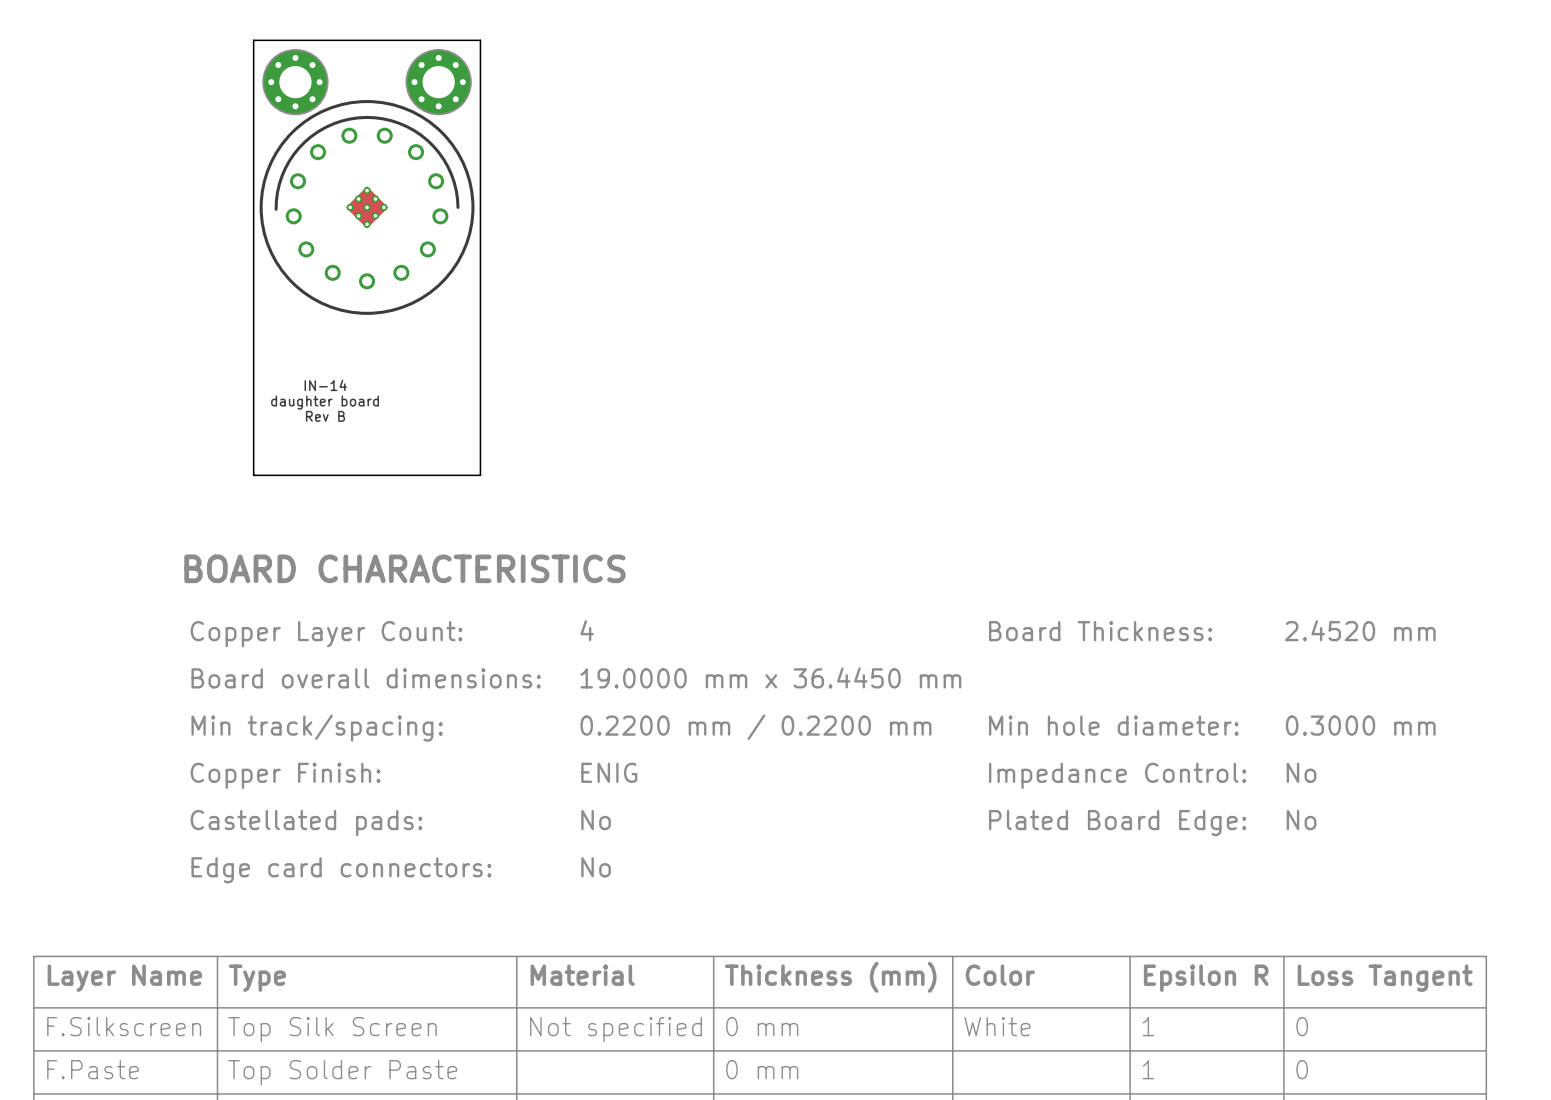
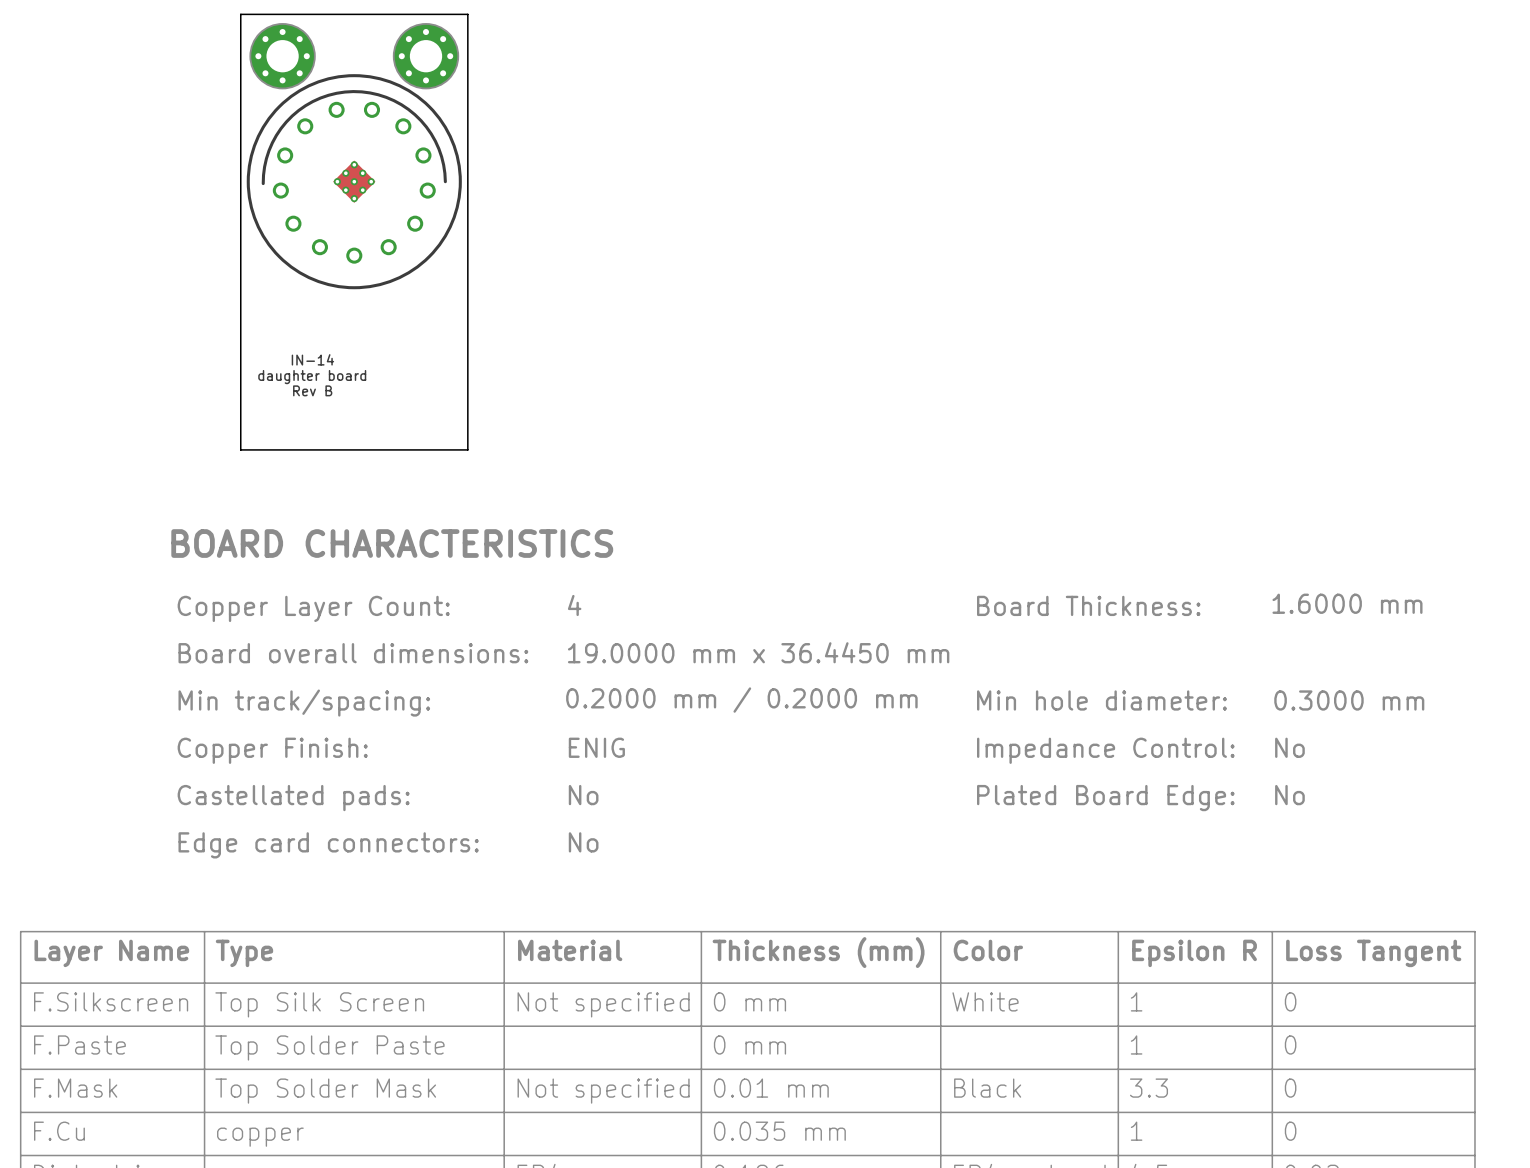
text: 2.4520 mm (1360, 630) -> 1.6000 mm (1347, 603)
text: 0.2200 mm / 0.2200 mm (755, 727) -> 0.2000 mm / 0.2000 mm (741, 700)

